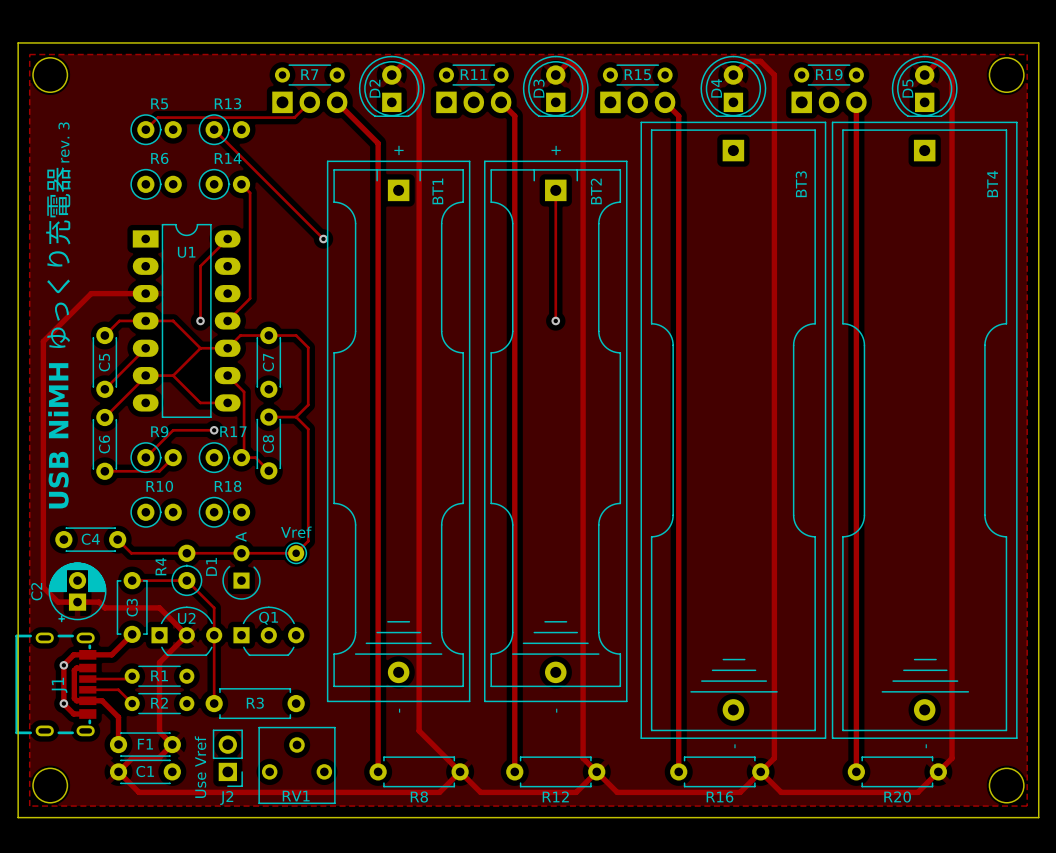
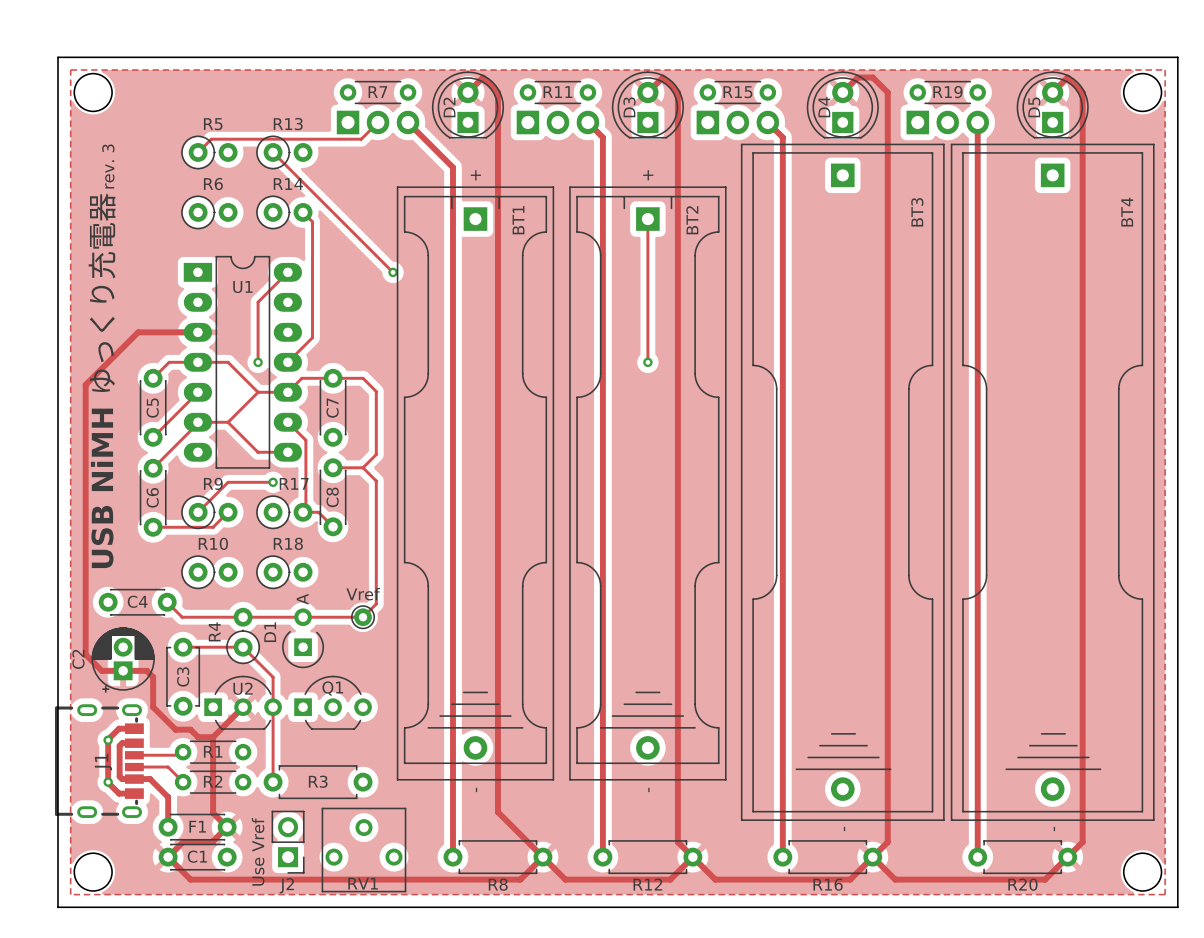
track: (104, 607) (159, 607) (186, 635) -> (153, 677) (153, 707) (175, 729) (190, 729) (198, 737) (213, 737)
track: (132, 634) (111, 654) (87, 654) -> none

